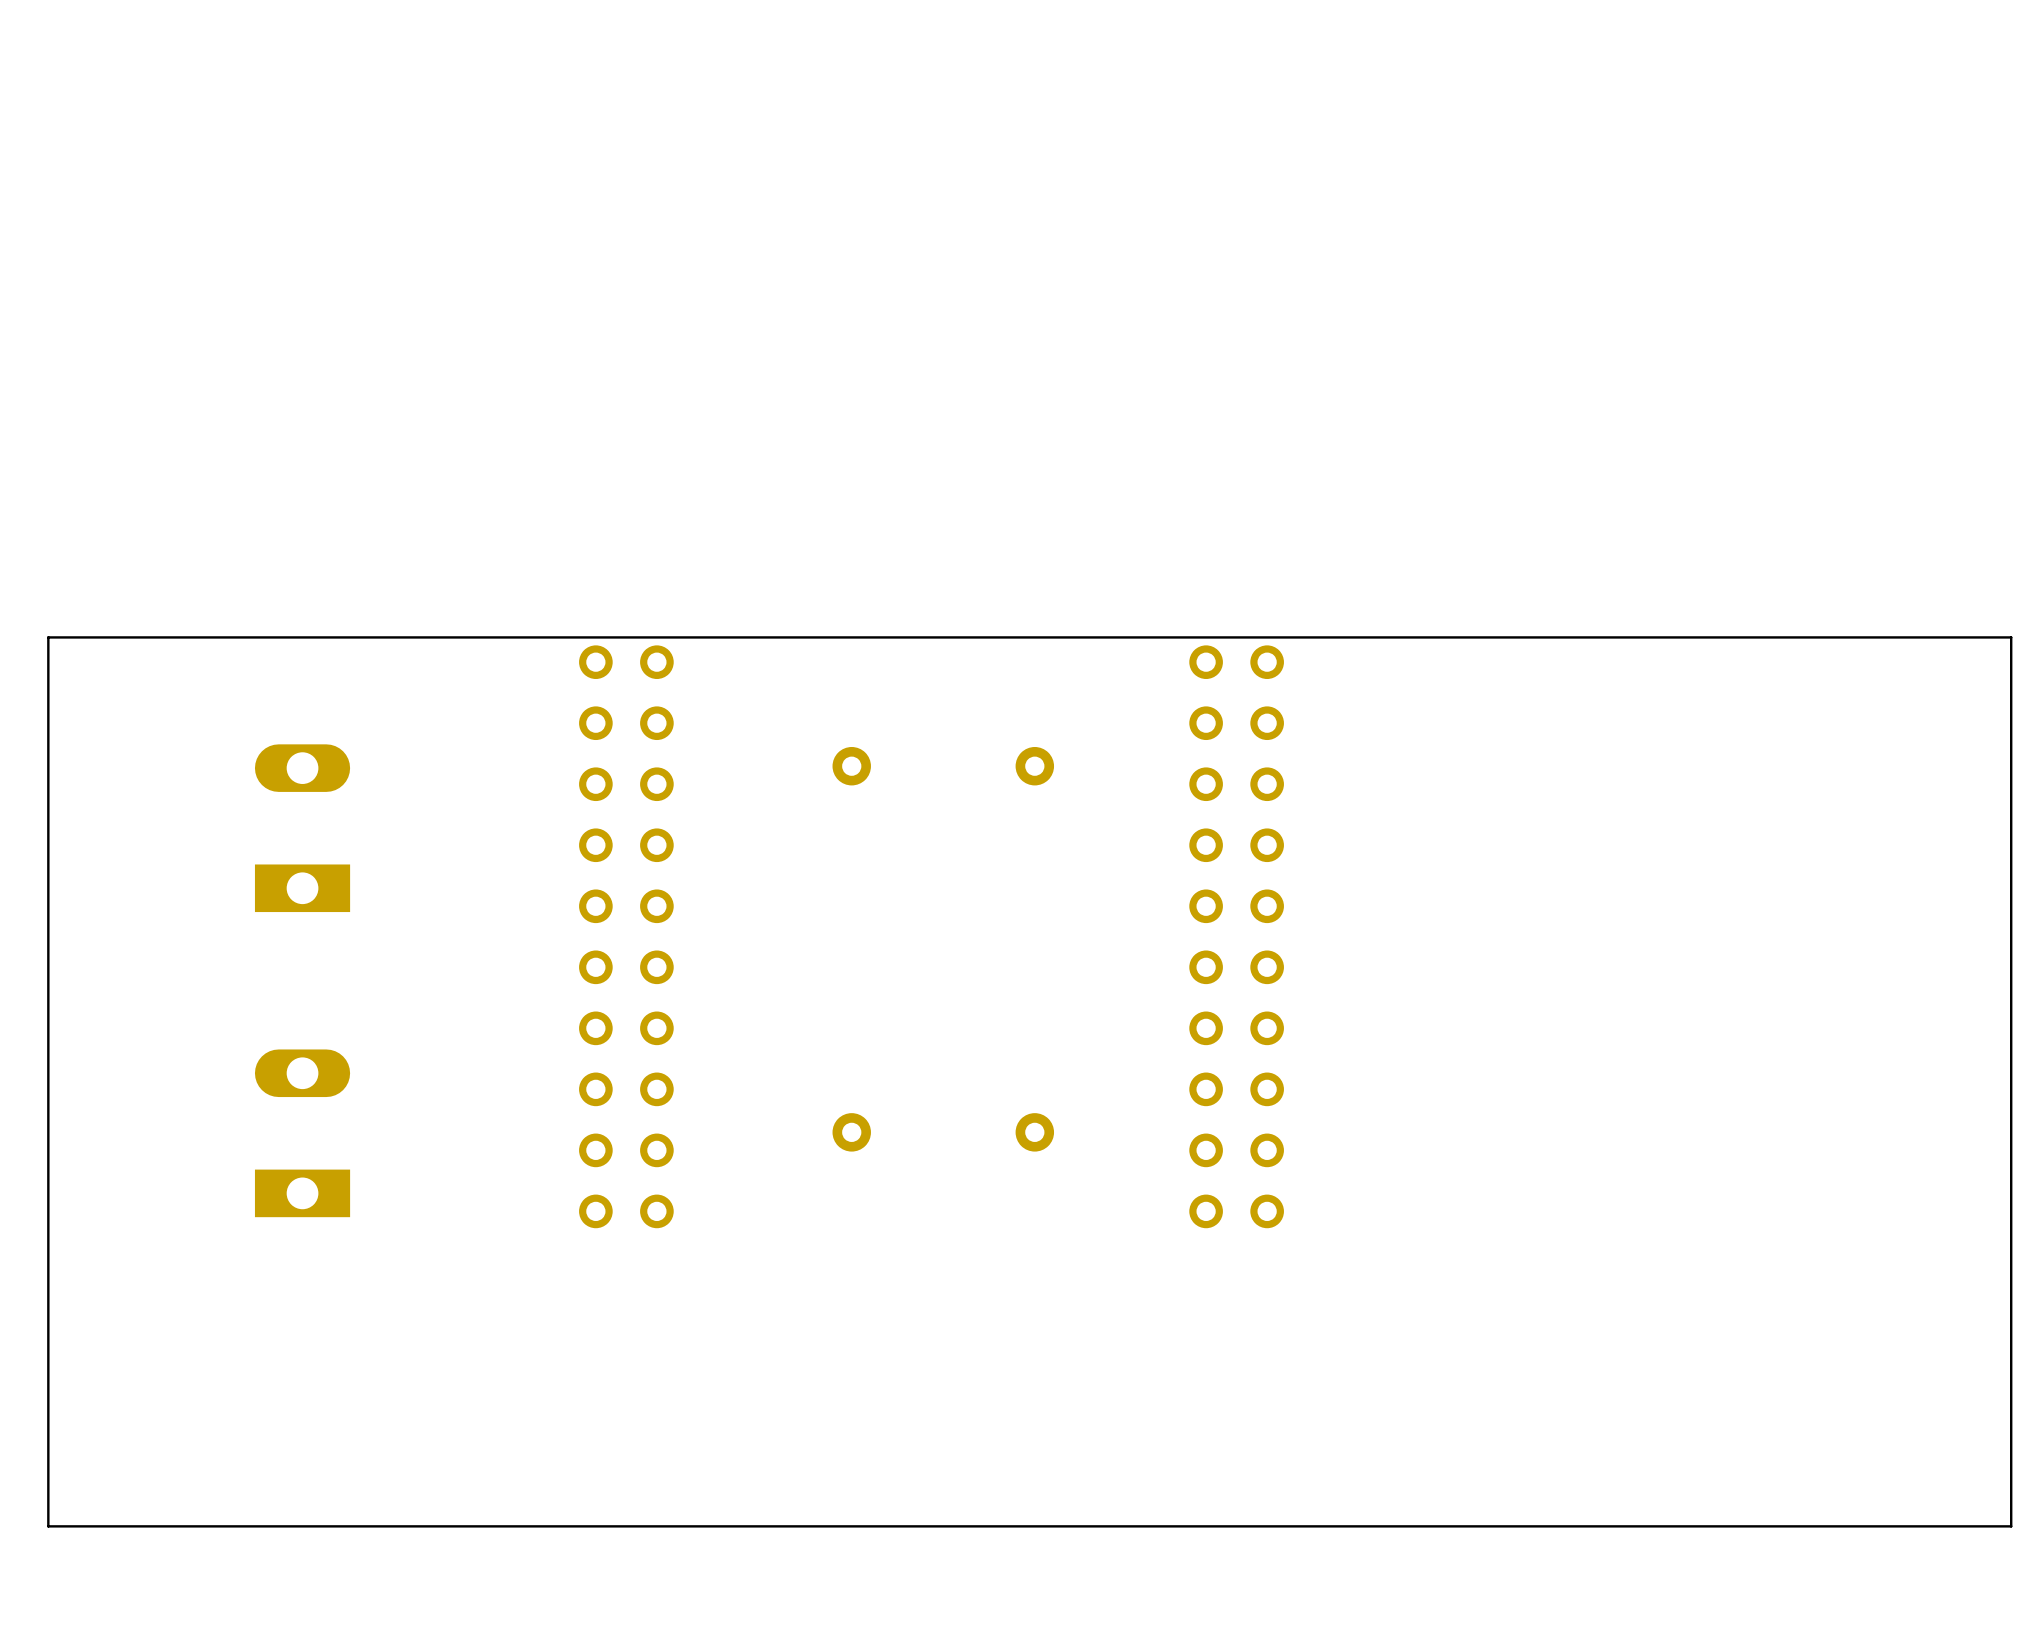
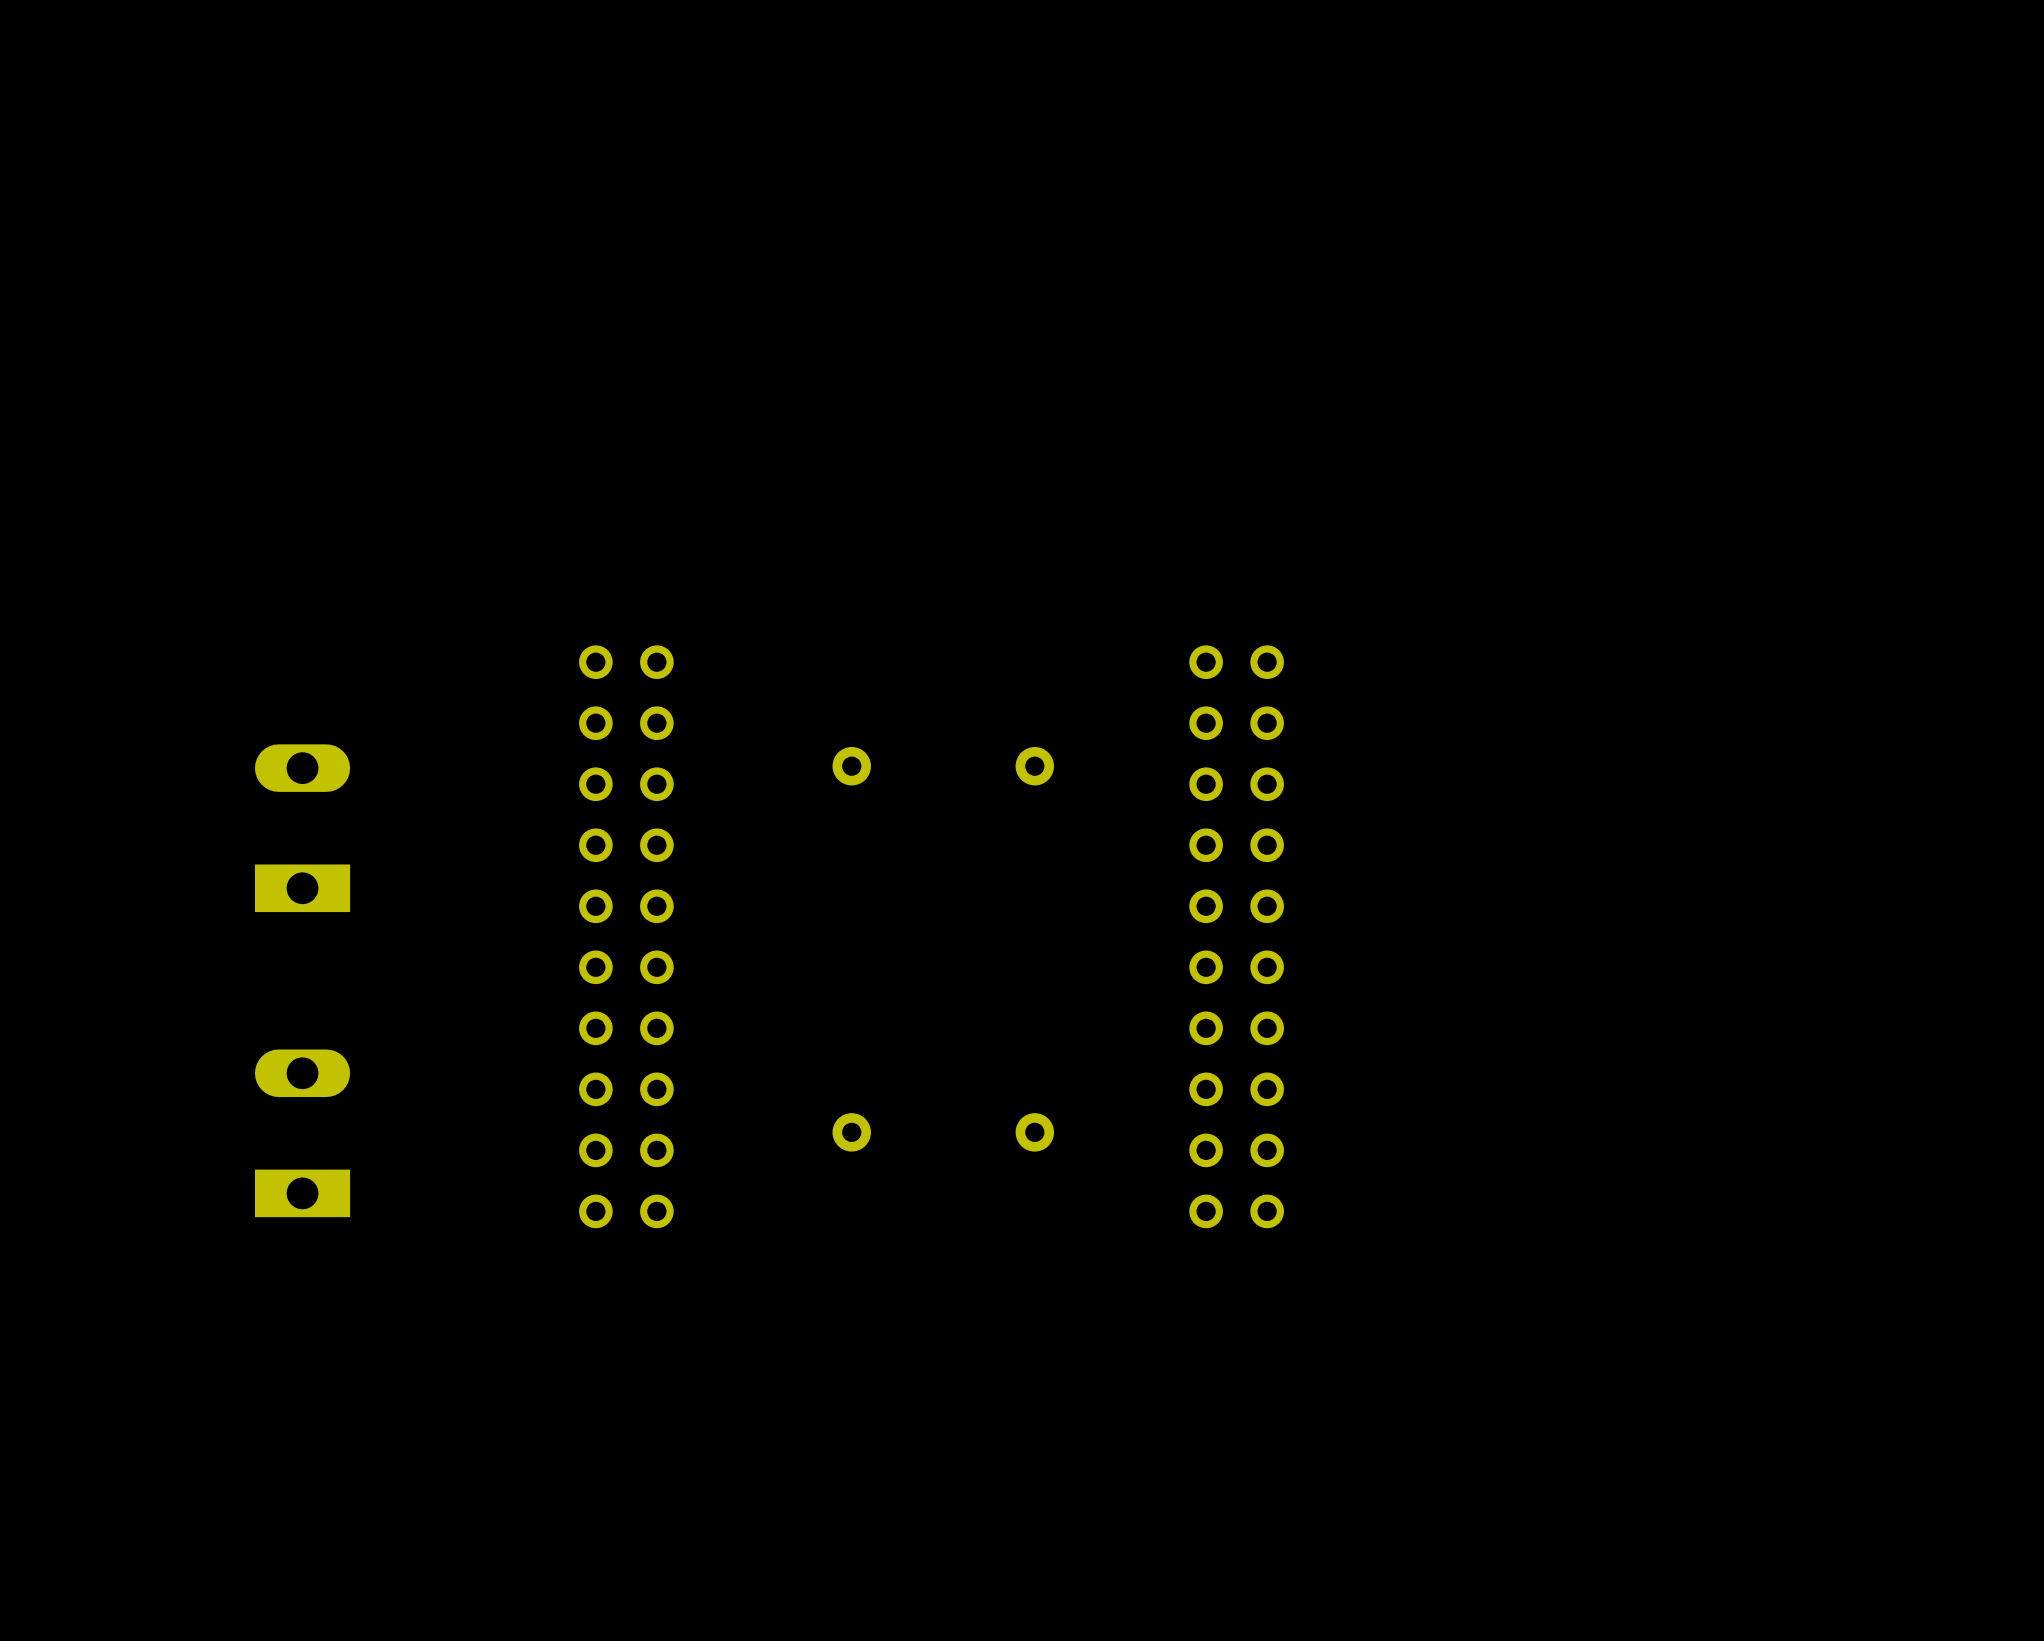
board edge: (2011, 637) (48, 637) (48, 1526) (2011, 1526) (2011, 637) -> none

